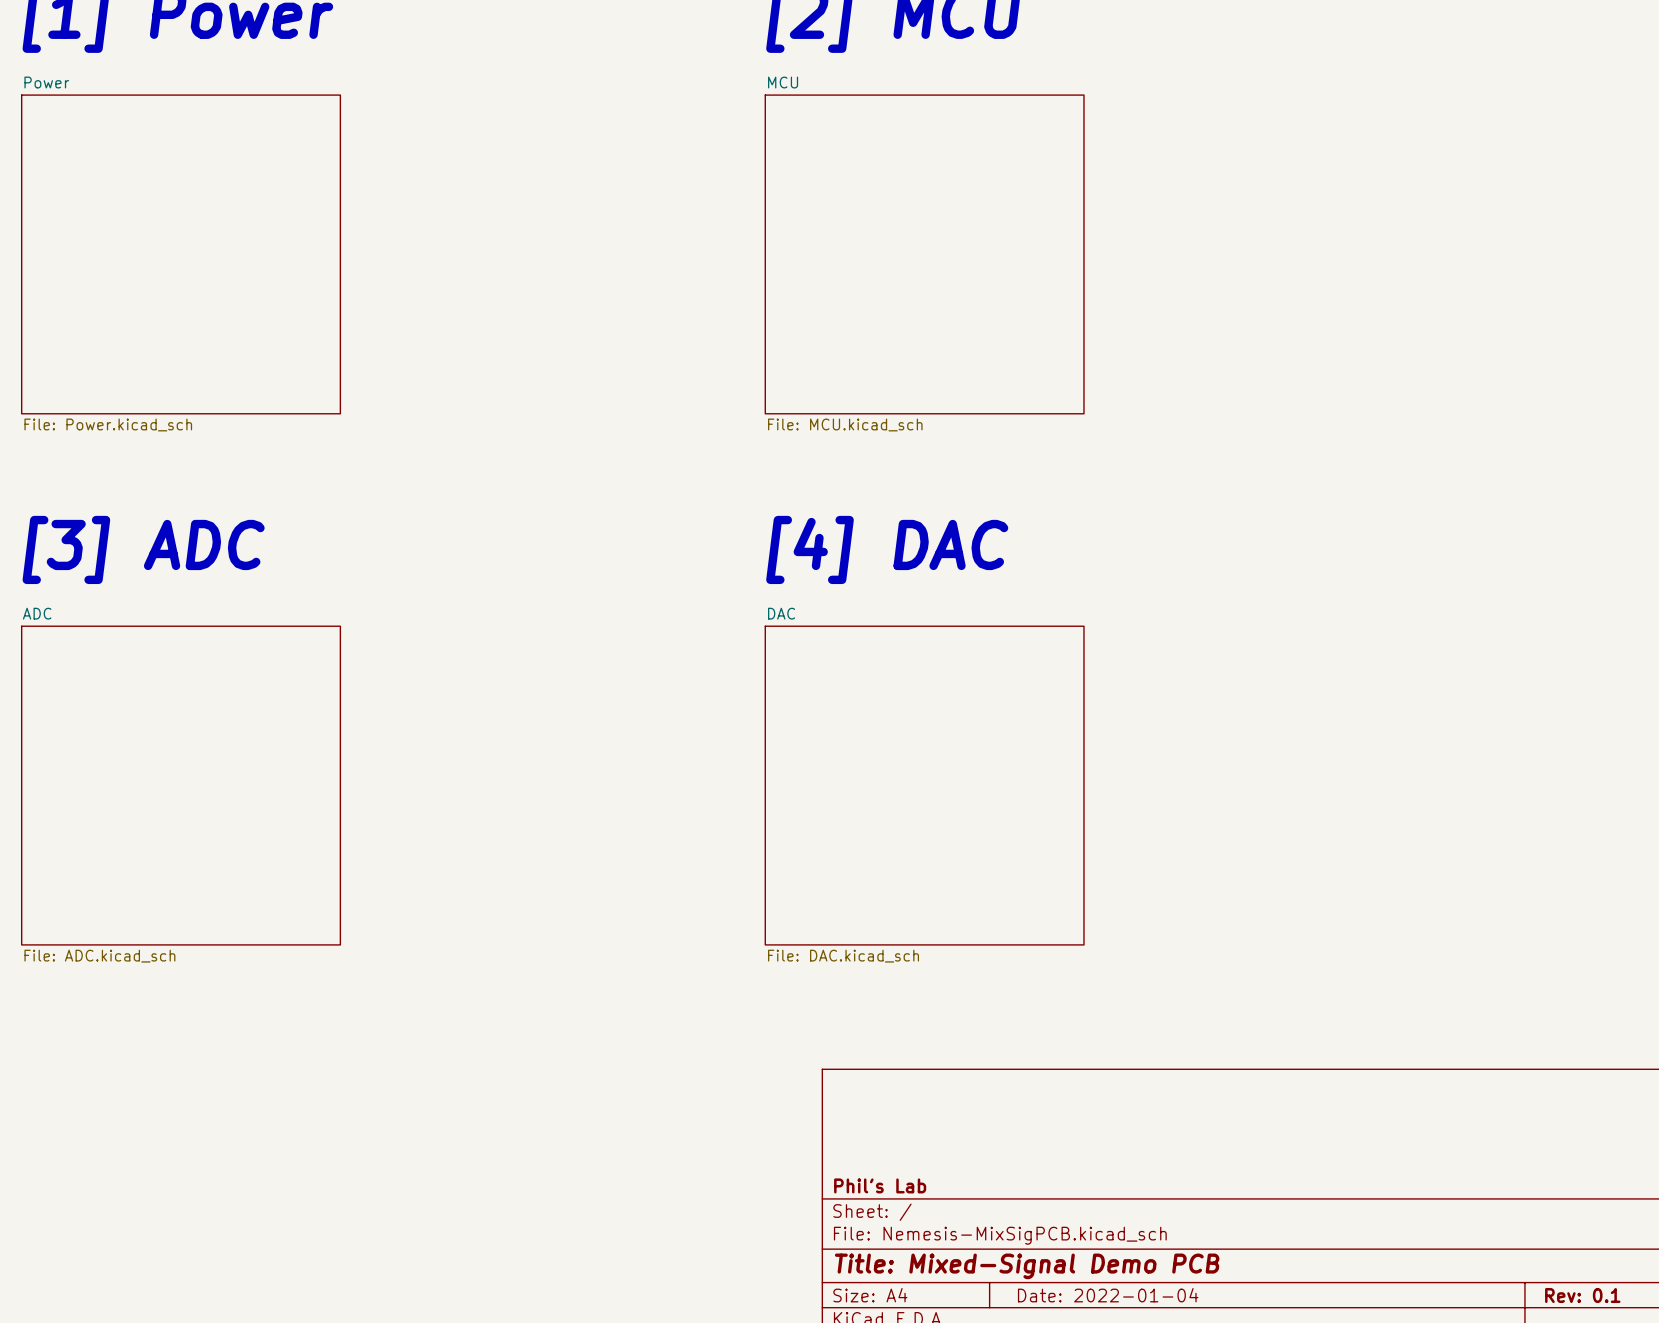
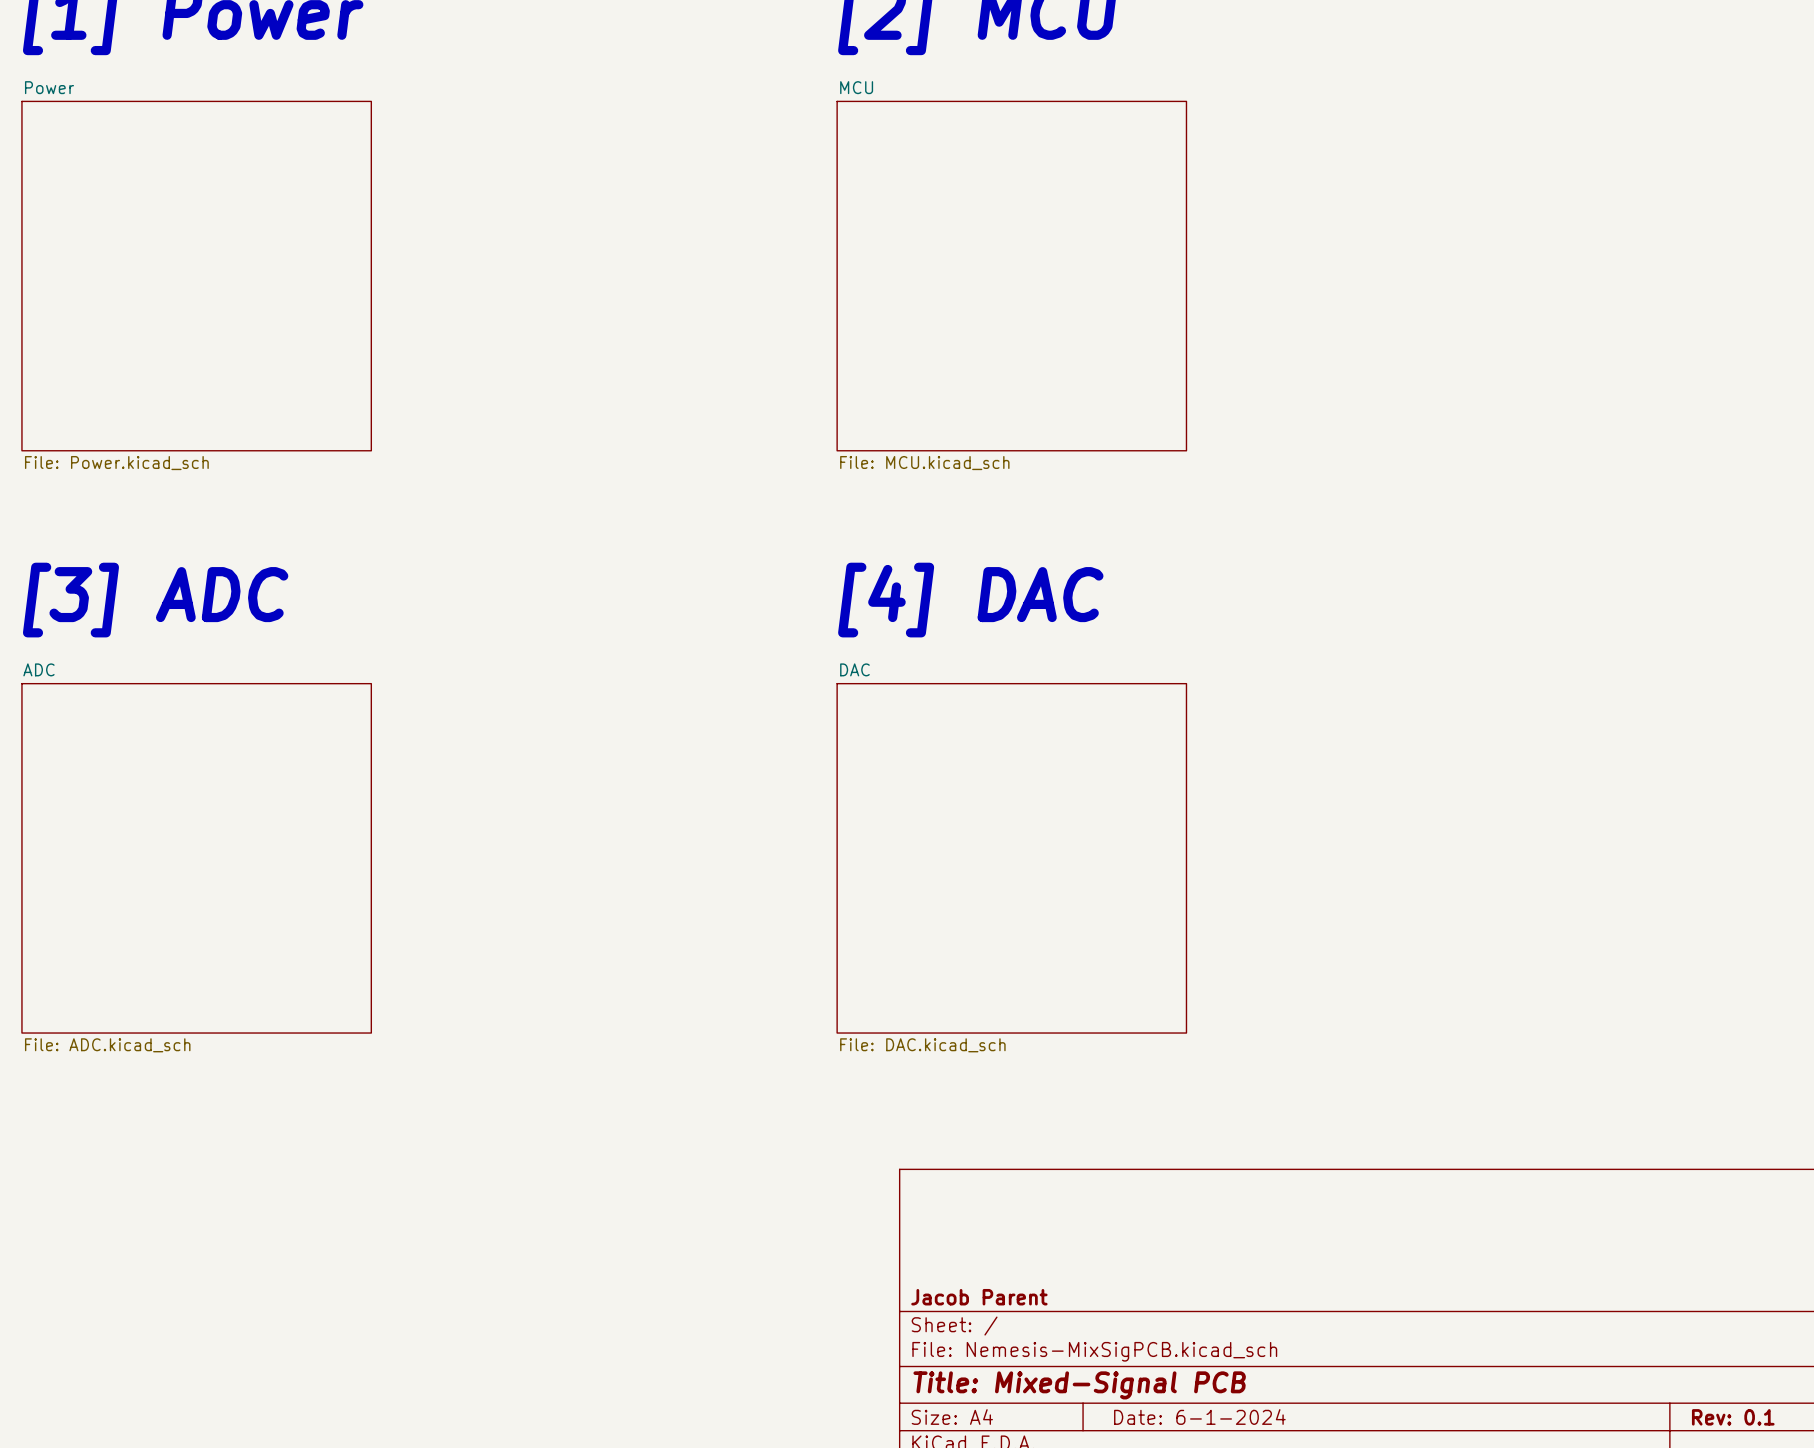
title block: Phil's Lab (880, 1185) -> Jacob Parent (979, 1297)
title block: Title: Mixed-Signal Demo PCB (1027, 1266) -> Title: Mixed-Signal PCB (1079, 1385)
title block: Date: 2022-01-04 (1108, 1295) -> Date: 6-1-2024 (1199, 1417)

